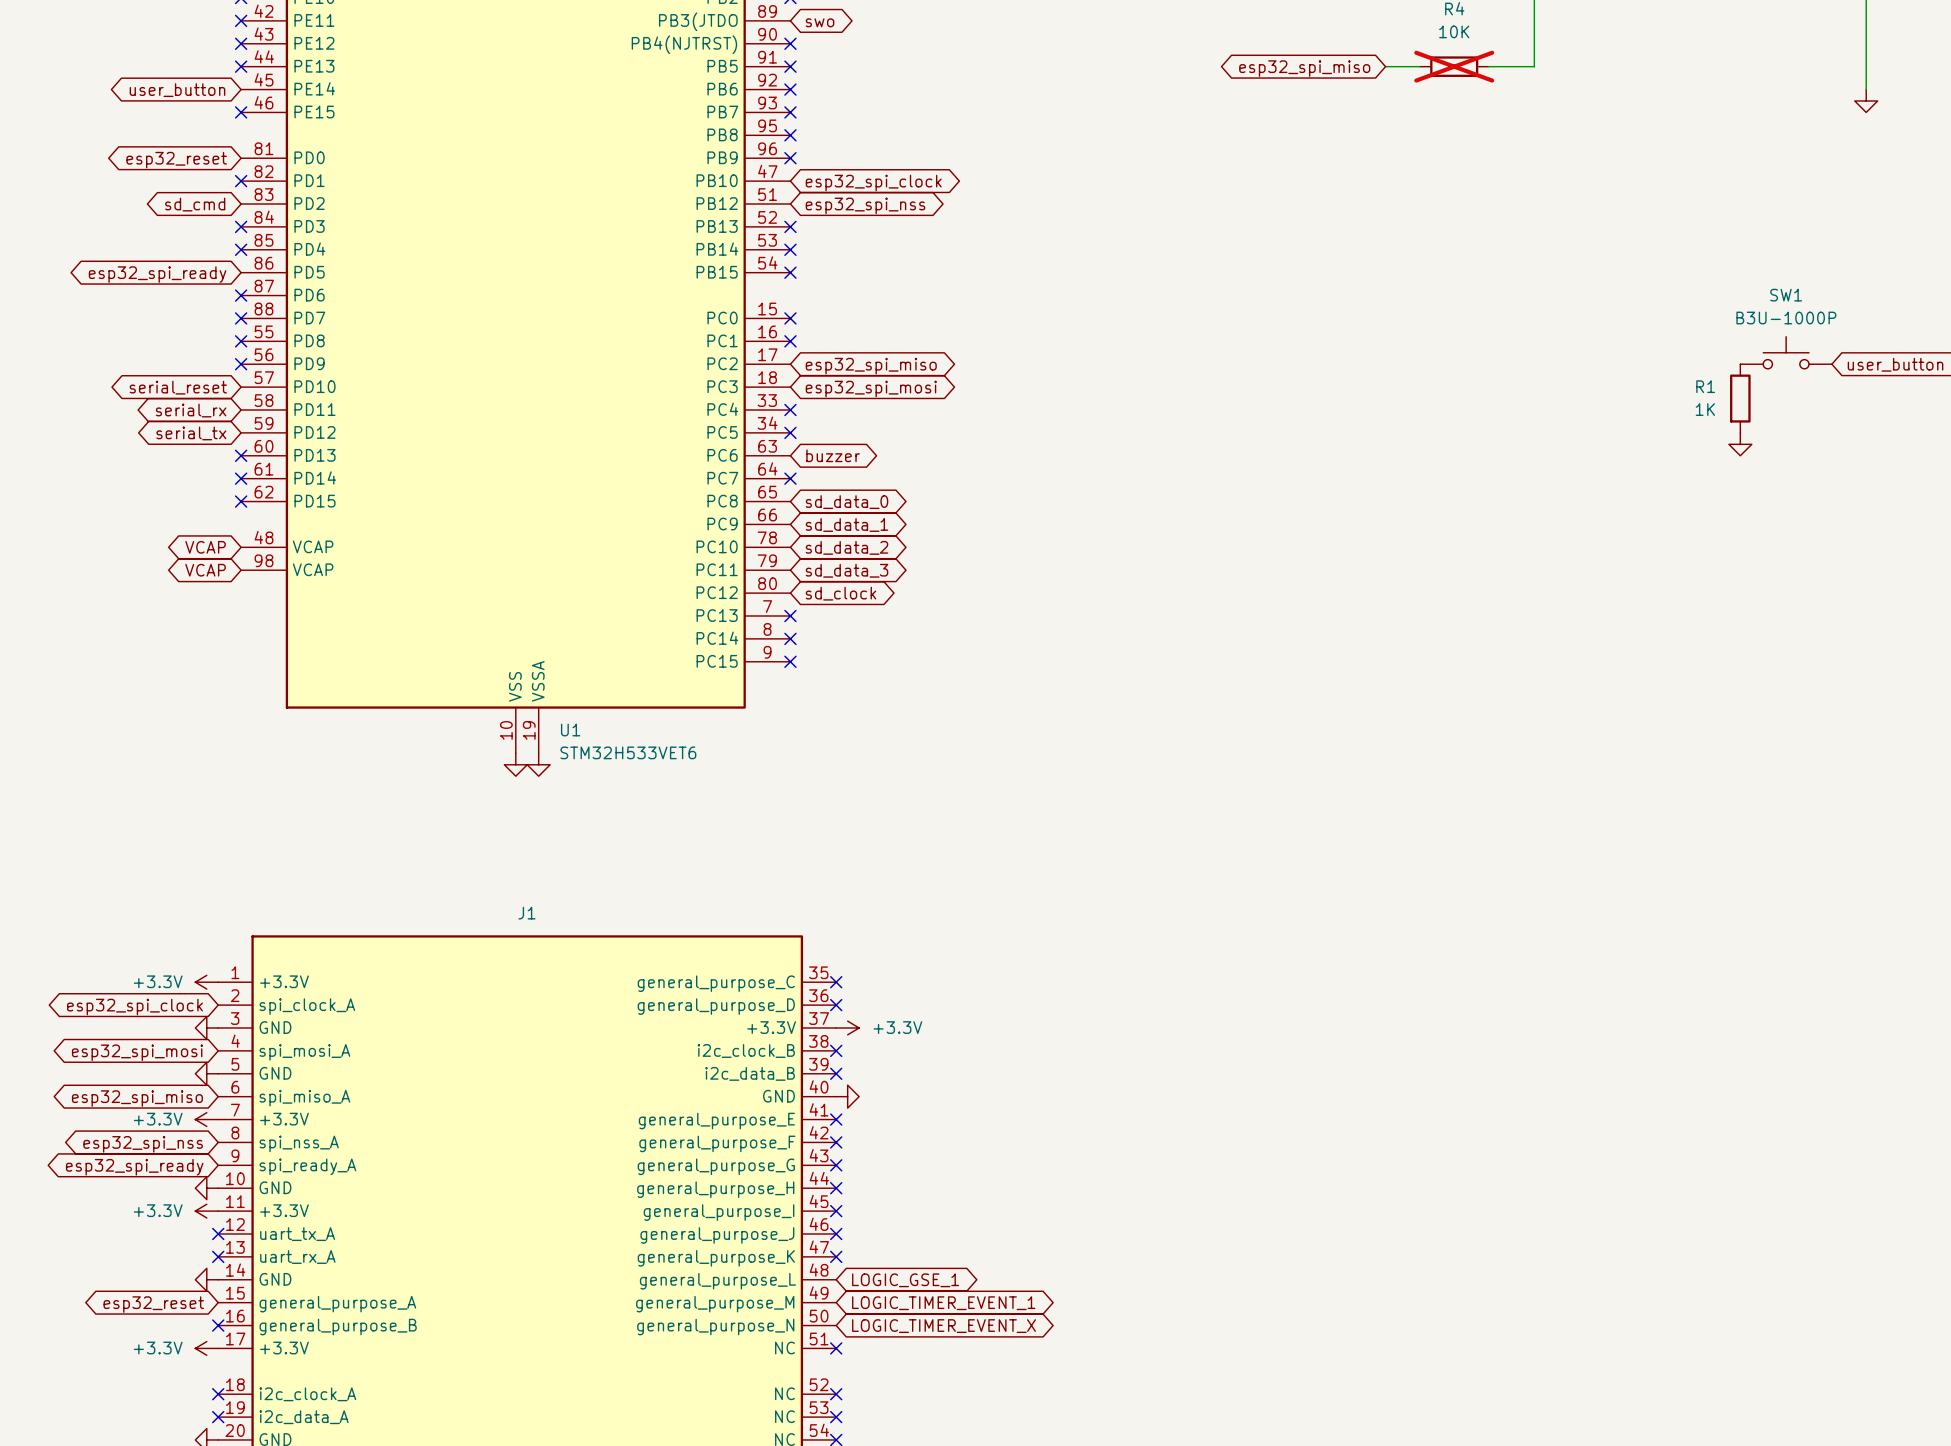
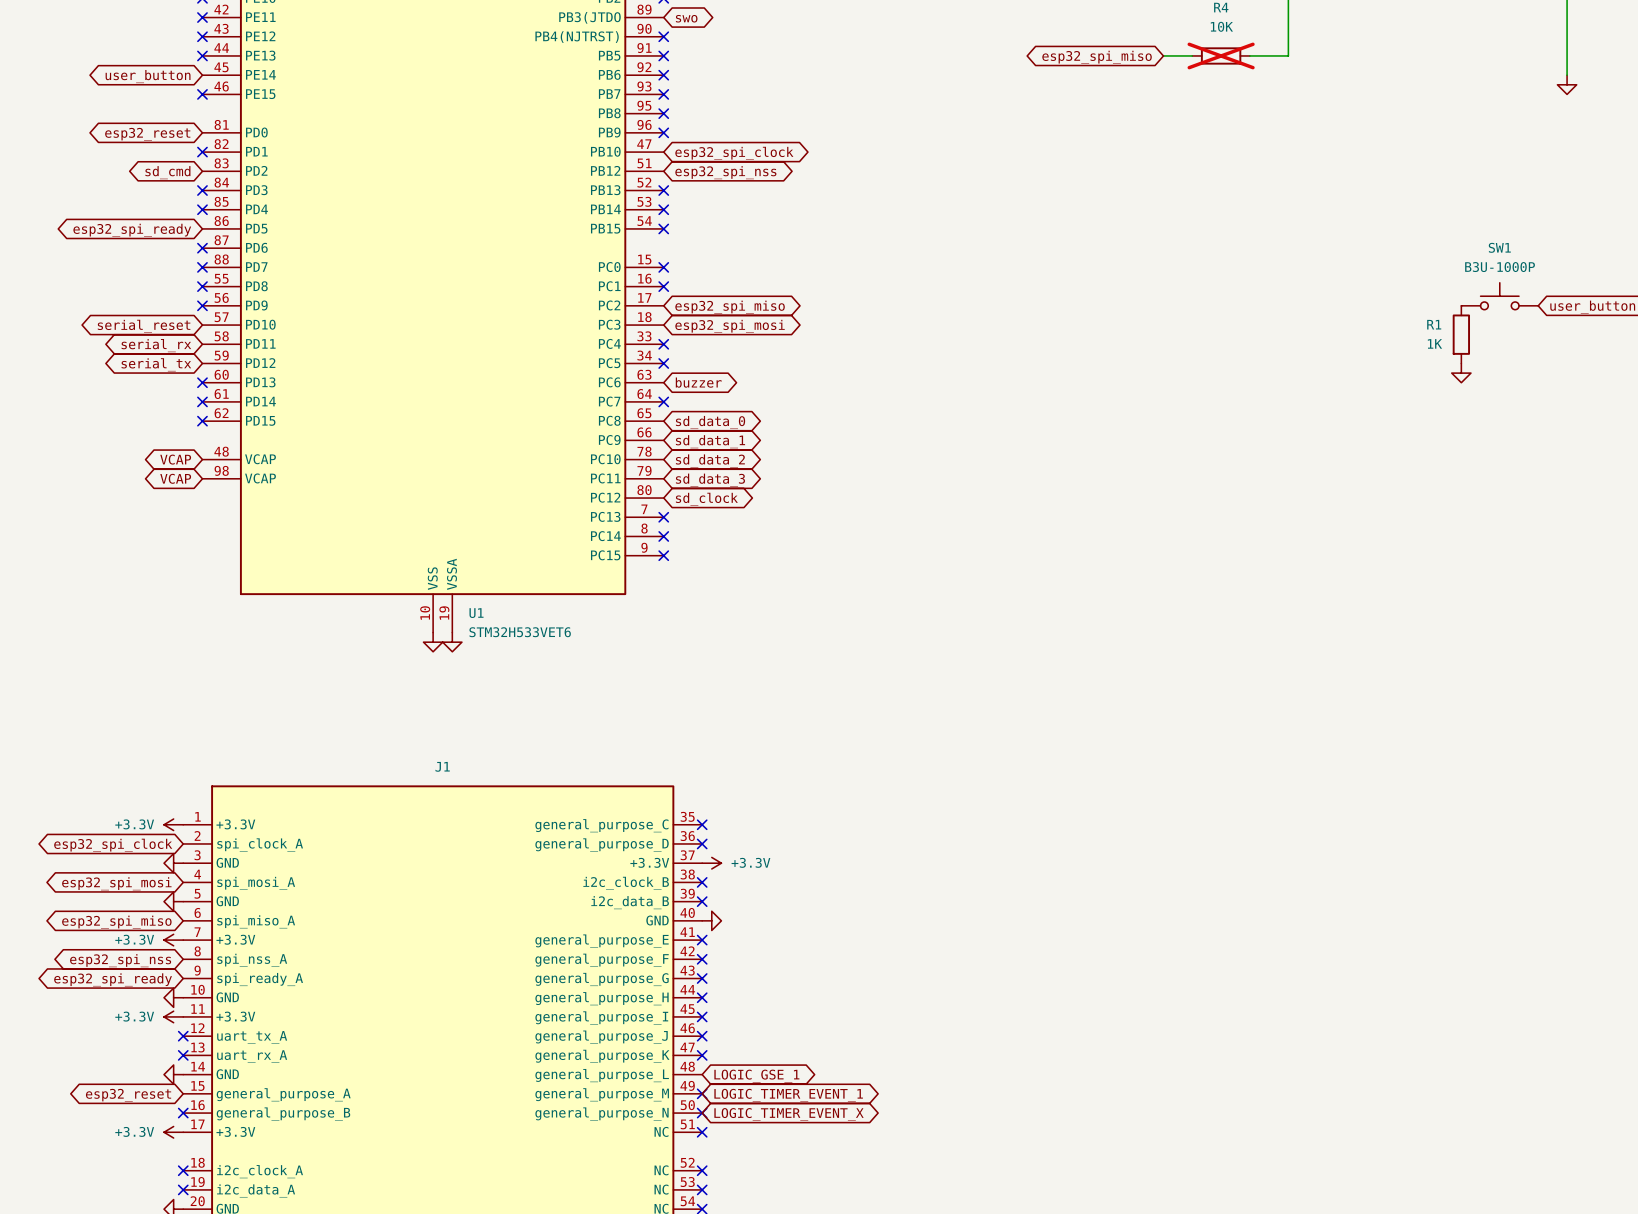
no-connect mark: none -> (702, 1093)
no-connect mark: none -> (702, 1113)

